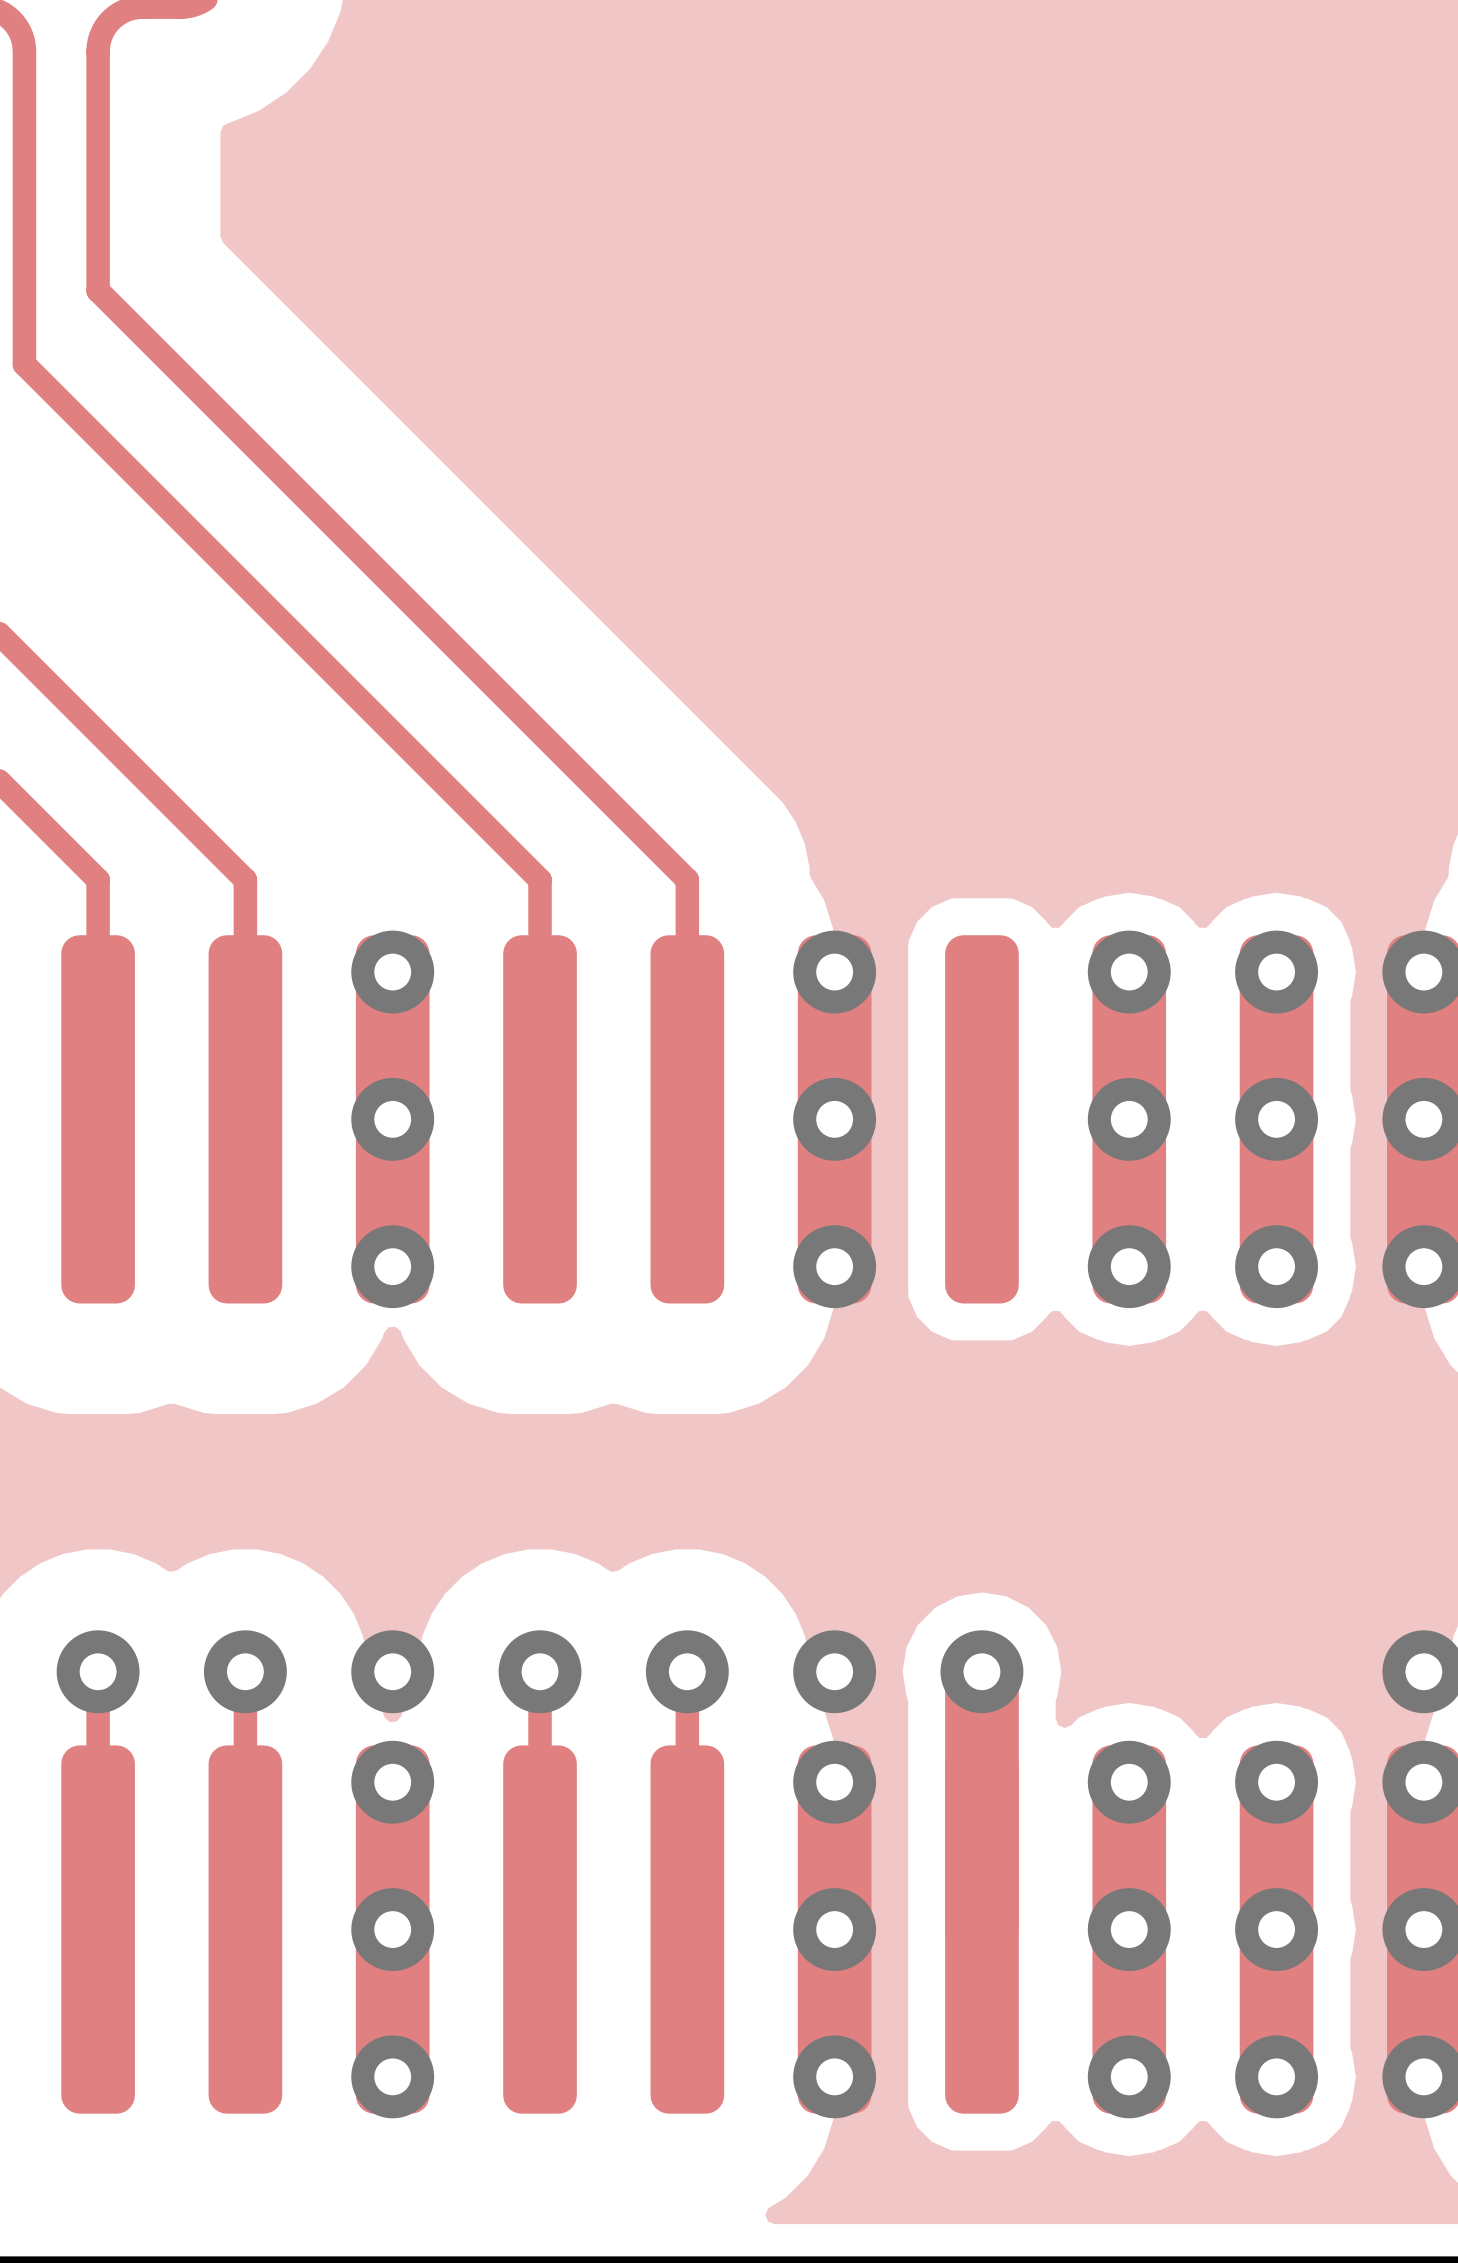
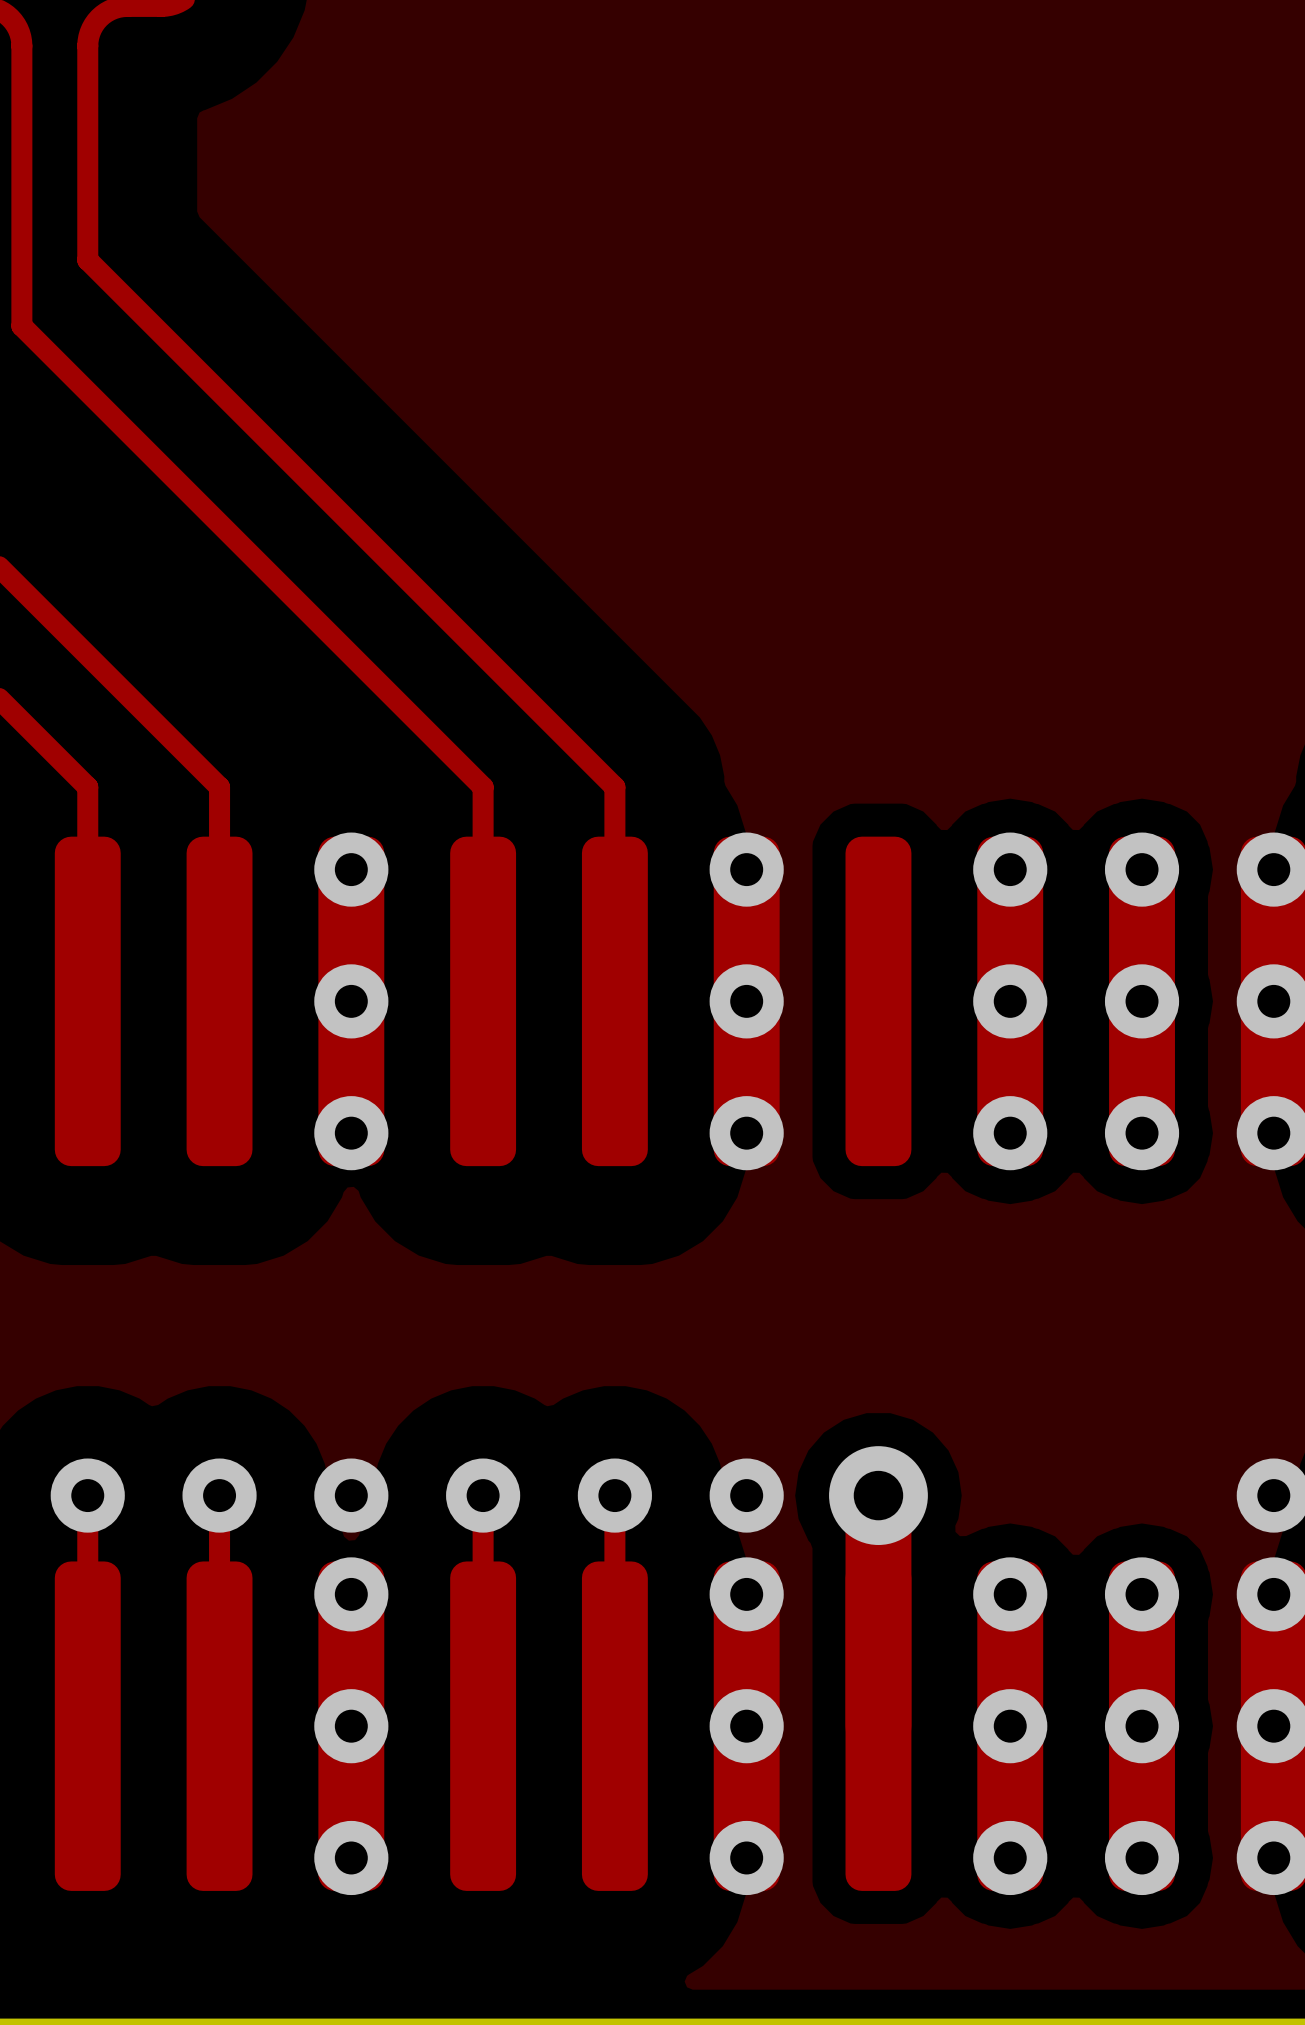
via size: [940, 1630, 1024, 1714] -> [829, 1446, 928, 1545]

